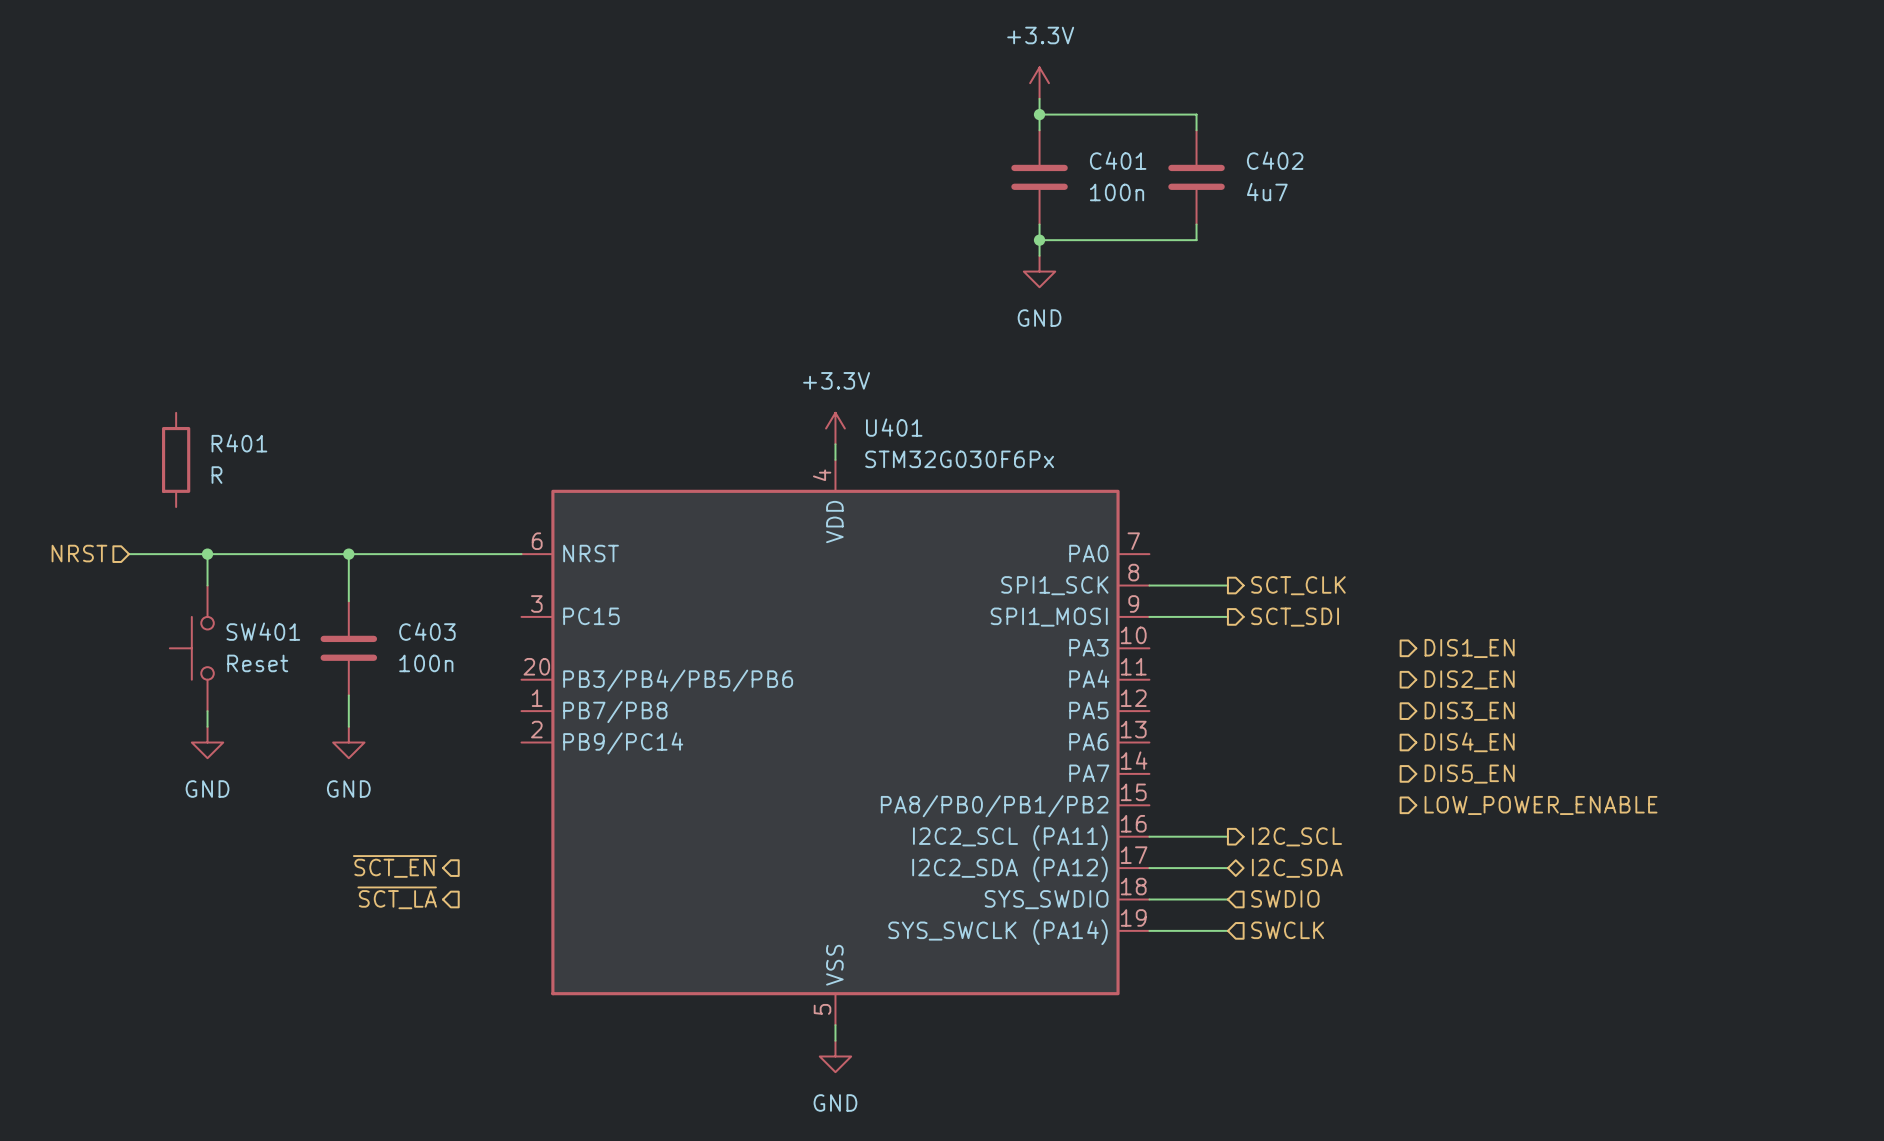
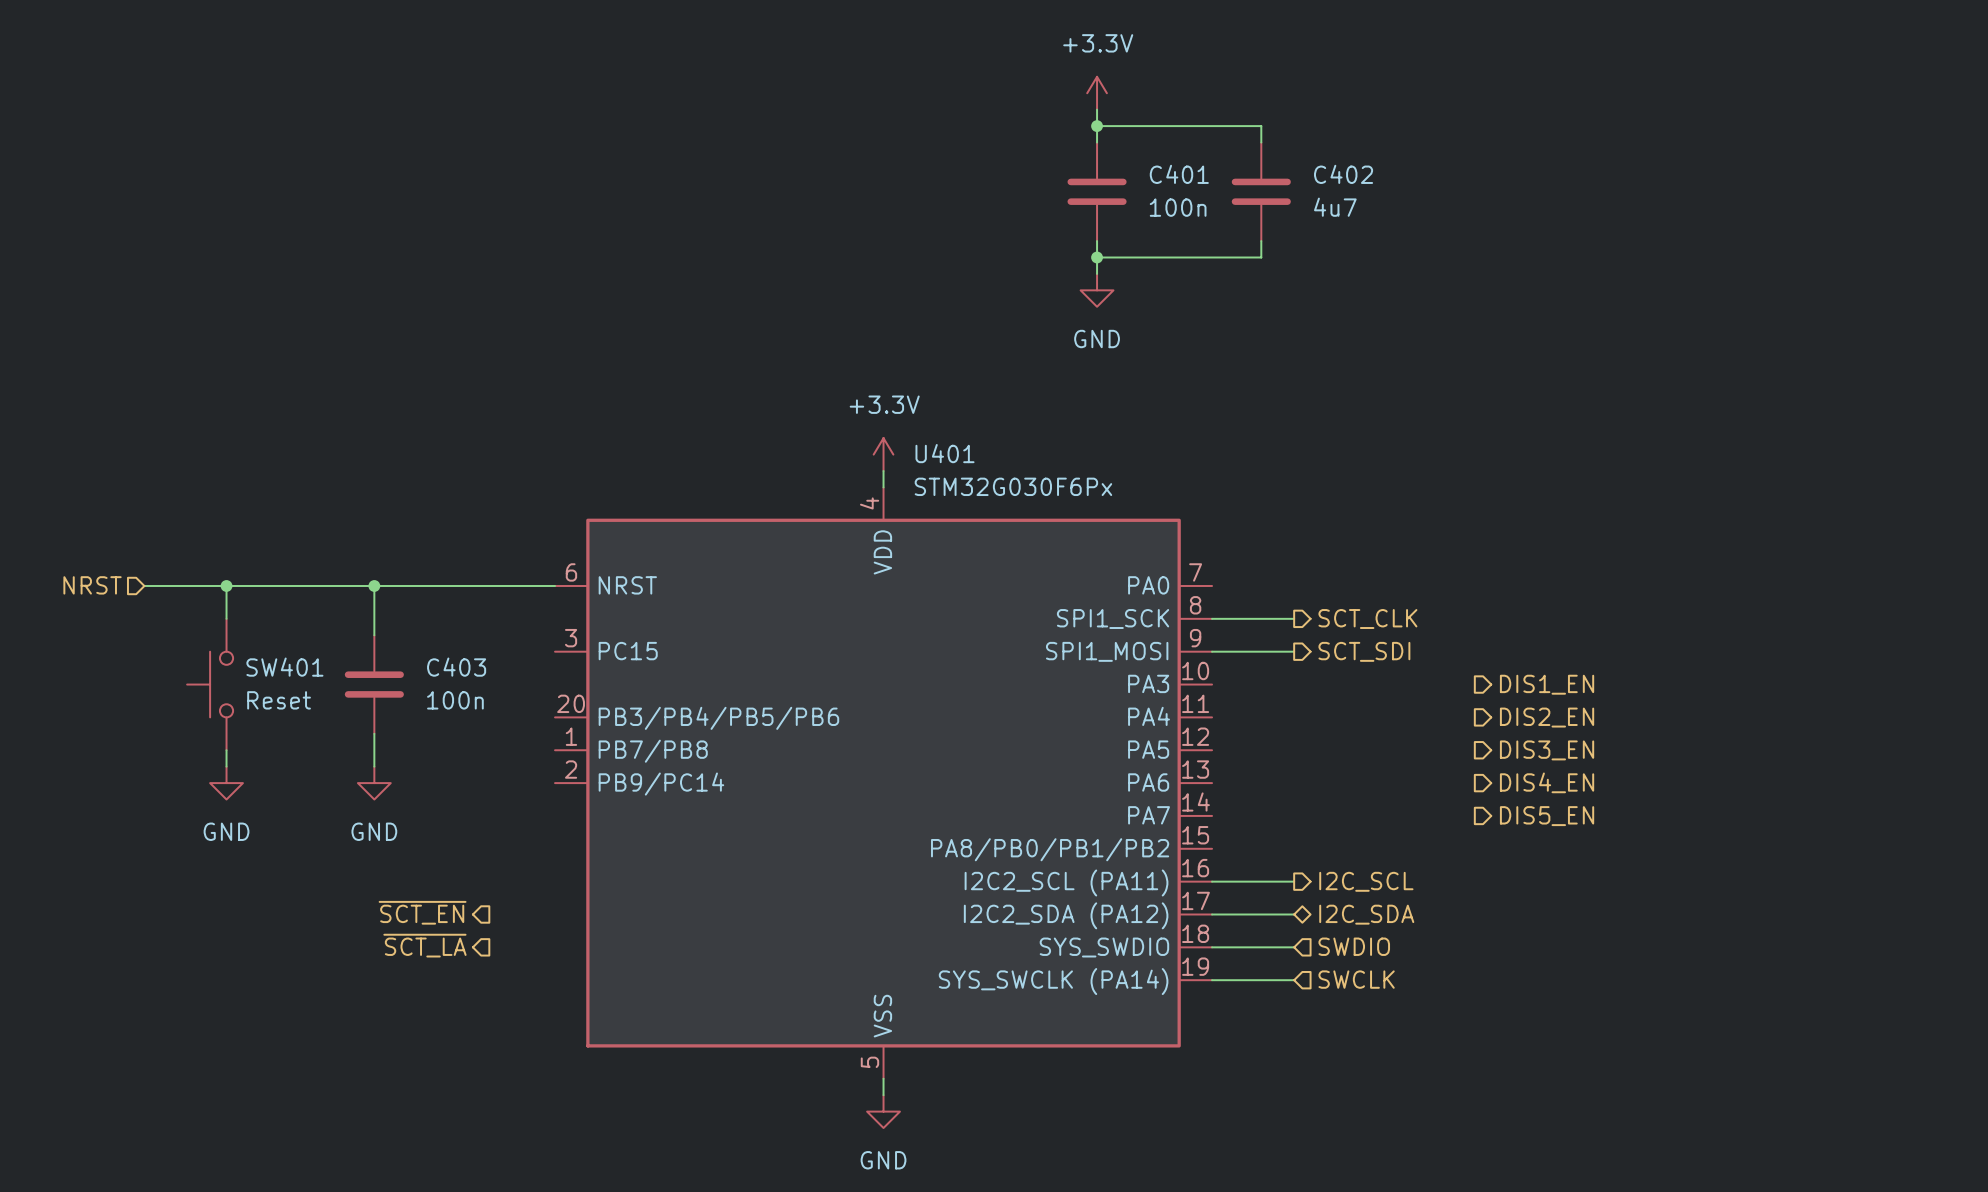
R401: R (176, 459) -> none
hierarchical label: LOW_POWER_ENABLE (1541, 805) -> none

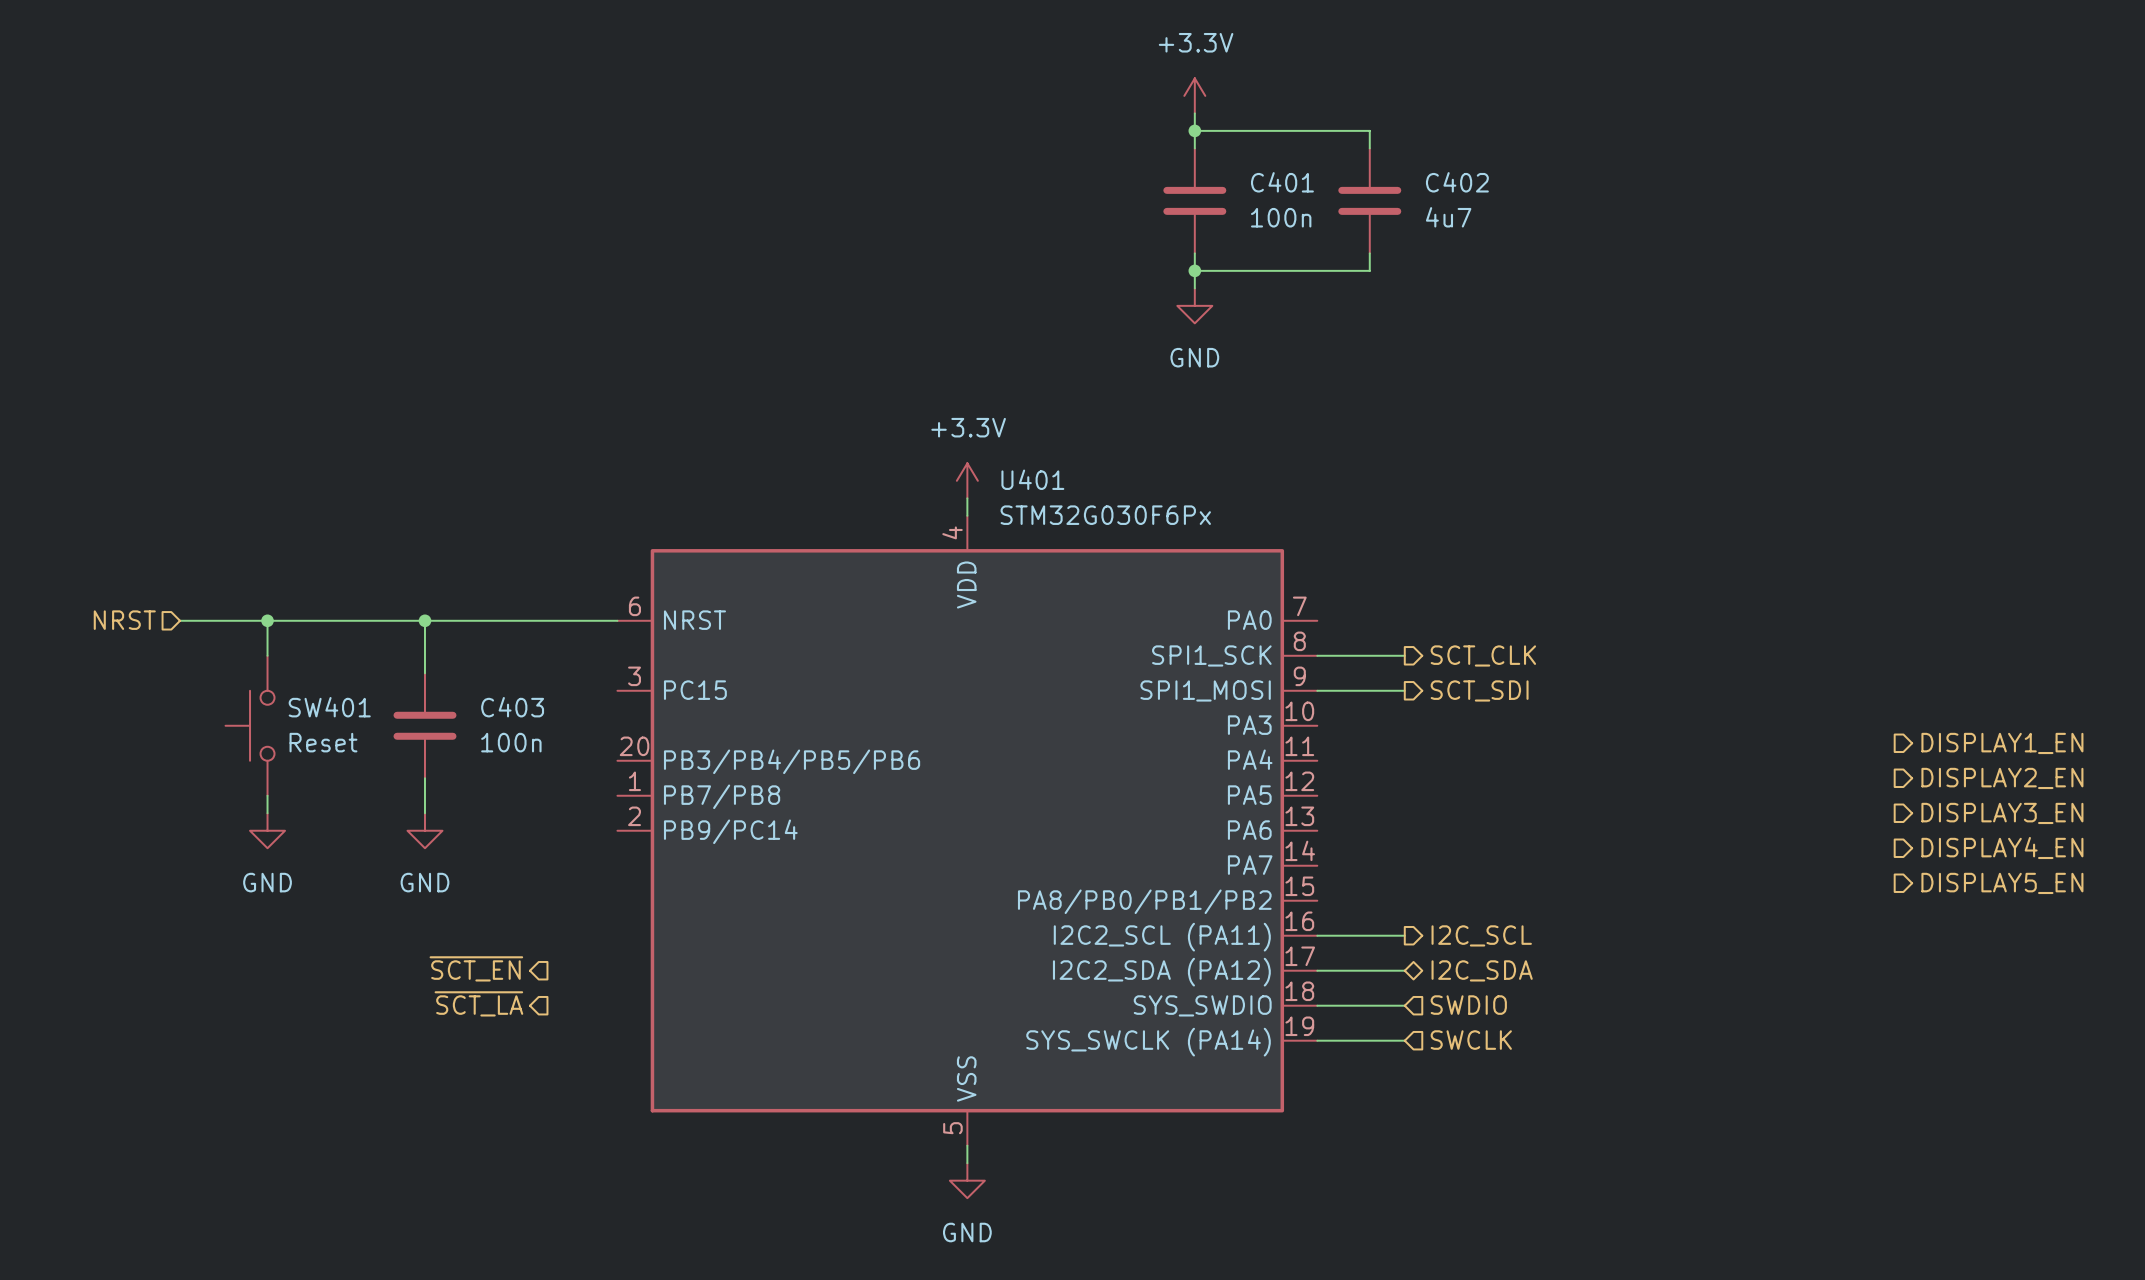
hierarchical label: DIS1_EN (1547, 684) -> none
hierarchical label: none -> DISPLAY1_EN (2002, 743)
hierarchical label: DIS2_EN (1547, 717) -> none
hierarchical label: none -> DISPLAY2_EN (2002, 778)
hierarchical label: DIS3_EN (1547, 750) -> none
hierarchical label: none -> DISPLAY3_EN (2002, 813)
hierarchical label: DIS4_EN (1547, 782) -> none
hierarchical label: none -> DISPLAY4_EN (2002, 848)
hierarchical label: DIS5_EN (1547, 816) -> none
hierarchical label: none -> DISPLAY5_EN (2002, 883)

